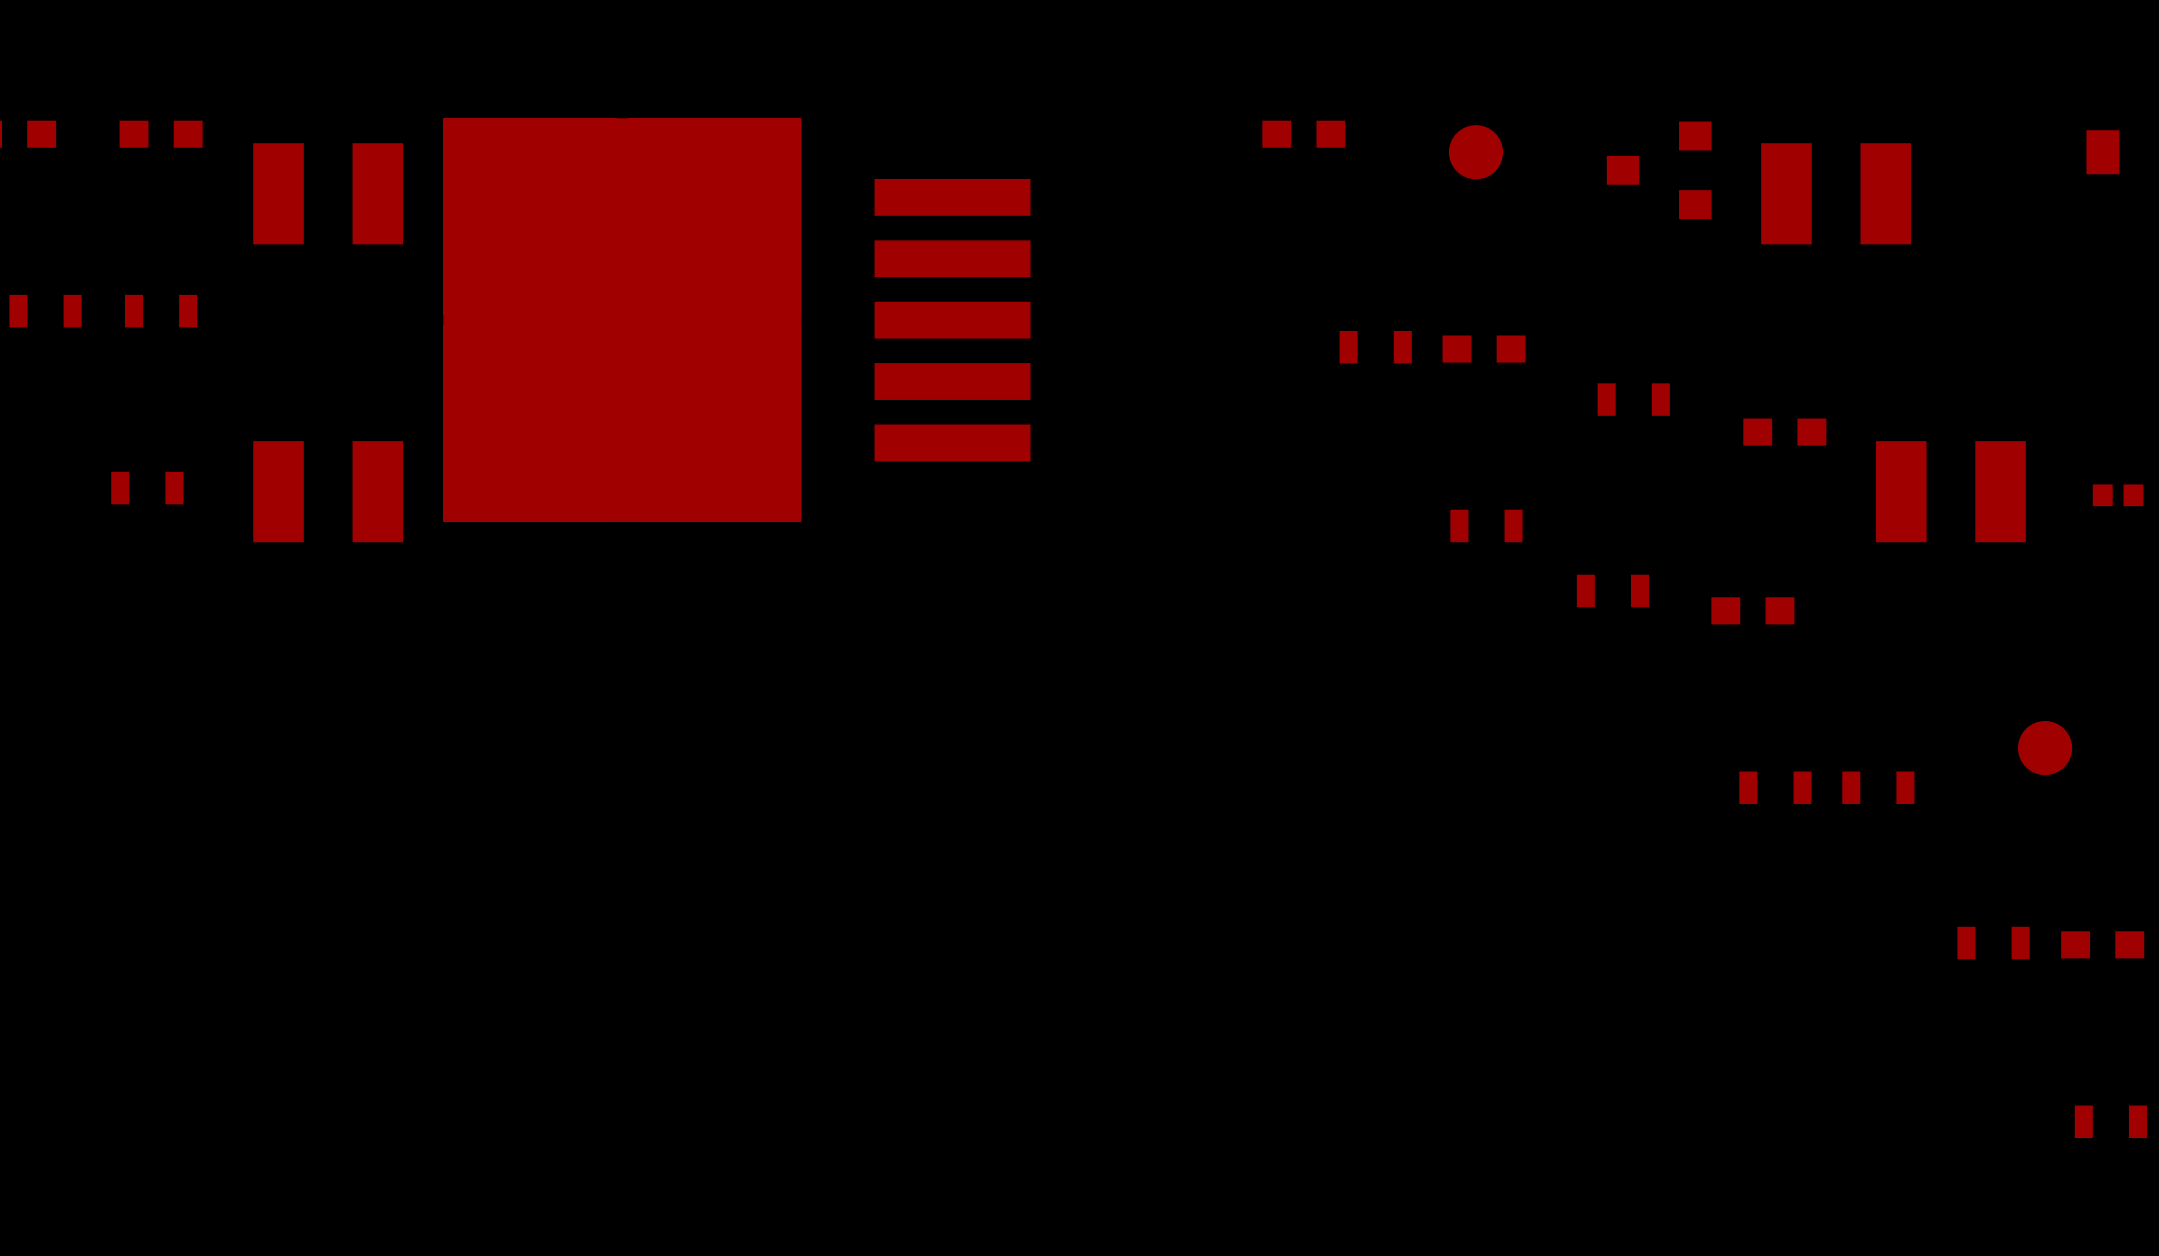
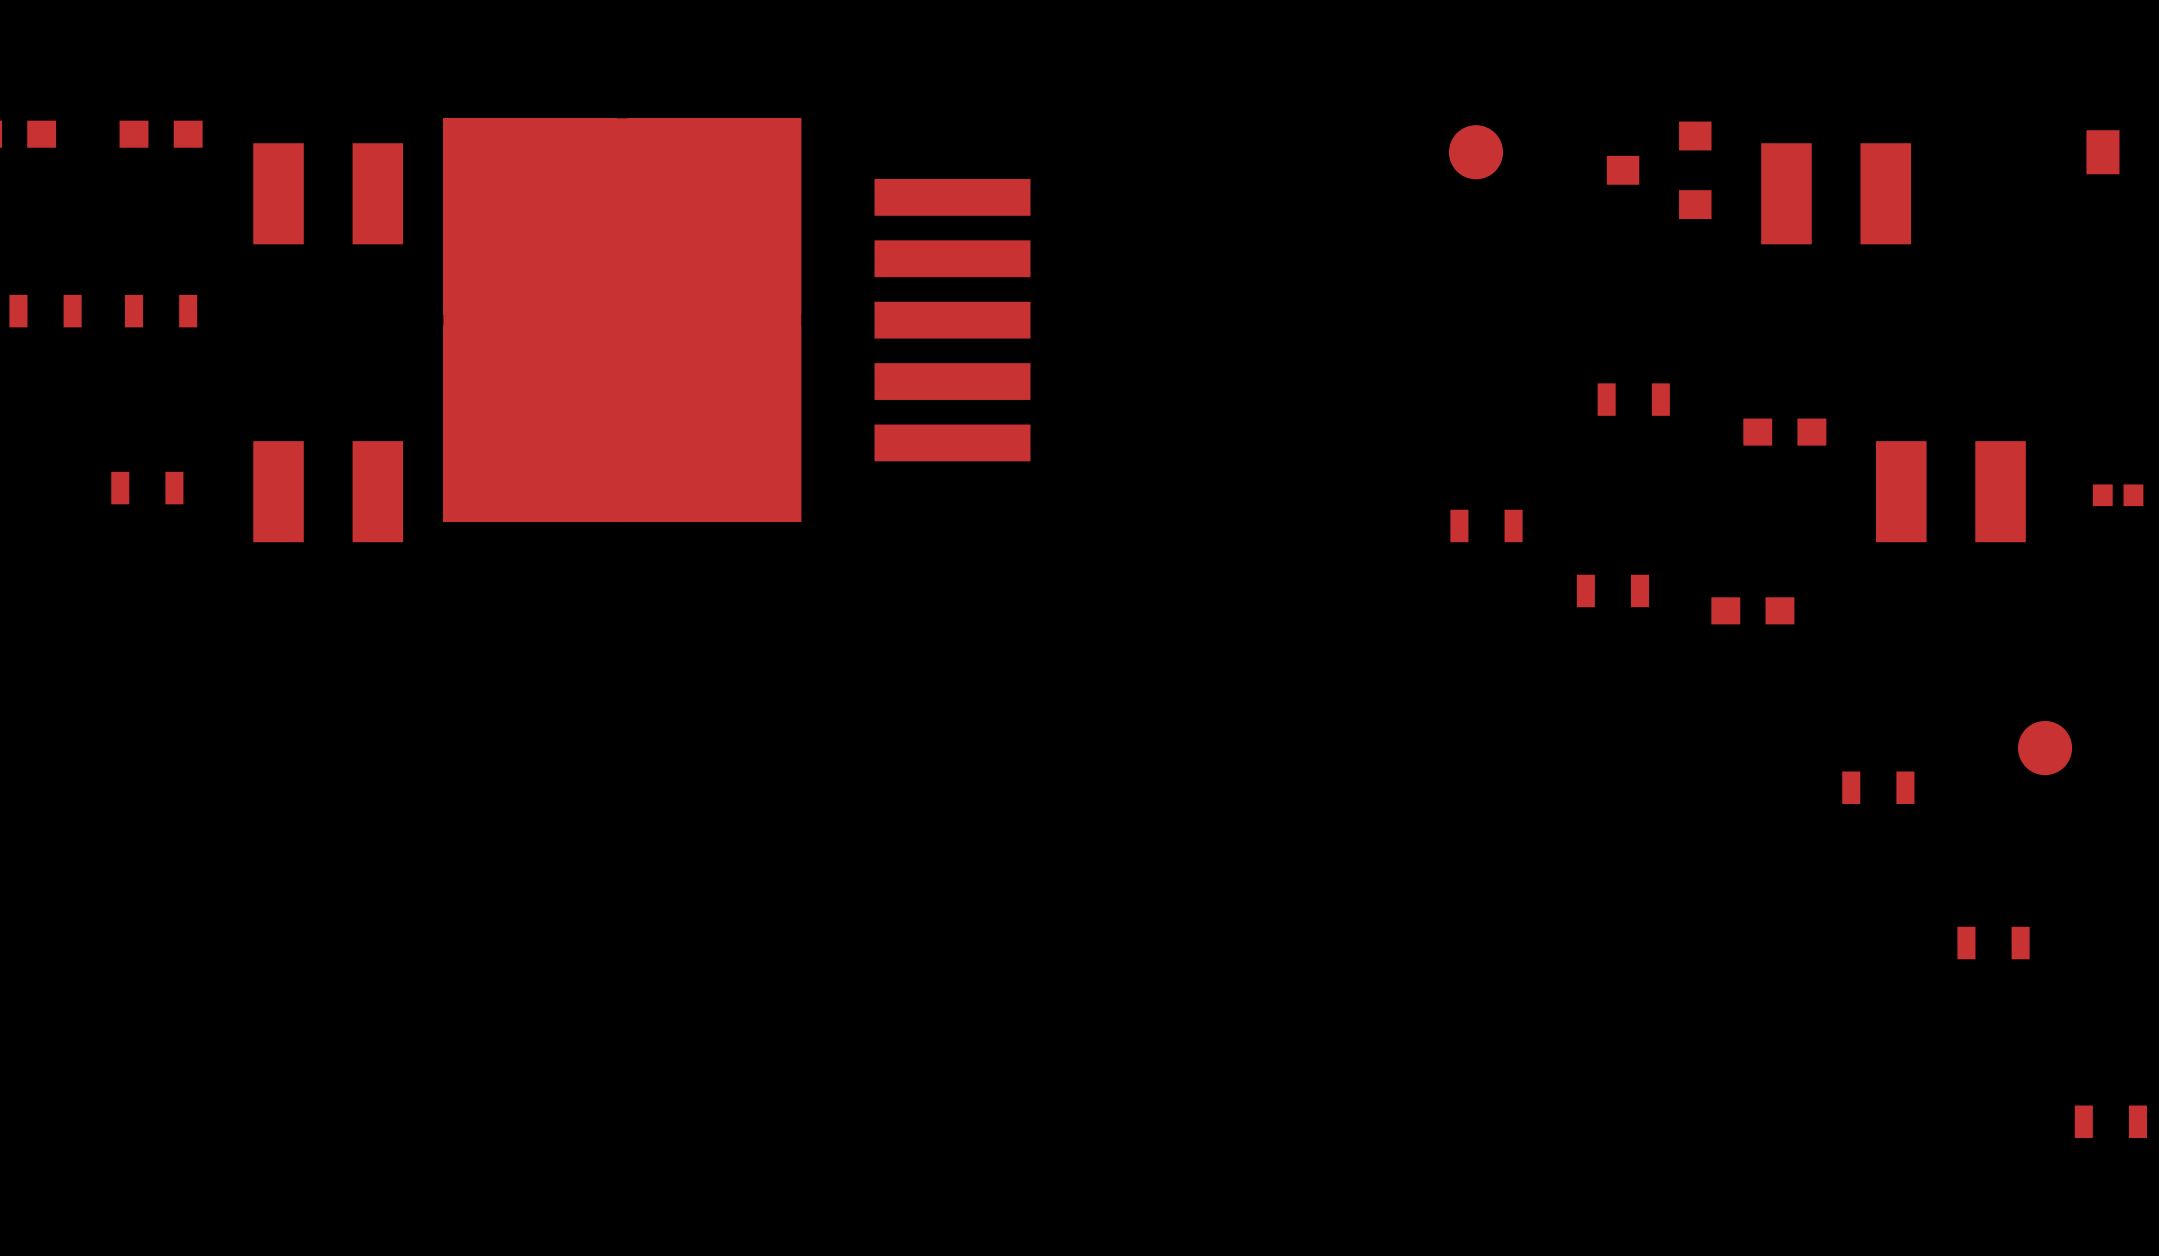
part: (1303, 134) -> none
part: (1375, 347) -> none
part: (1484, 349) -> none
part: (1775, 787) -> none
part: (2102, 944) -> none

